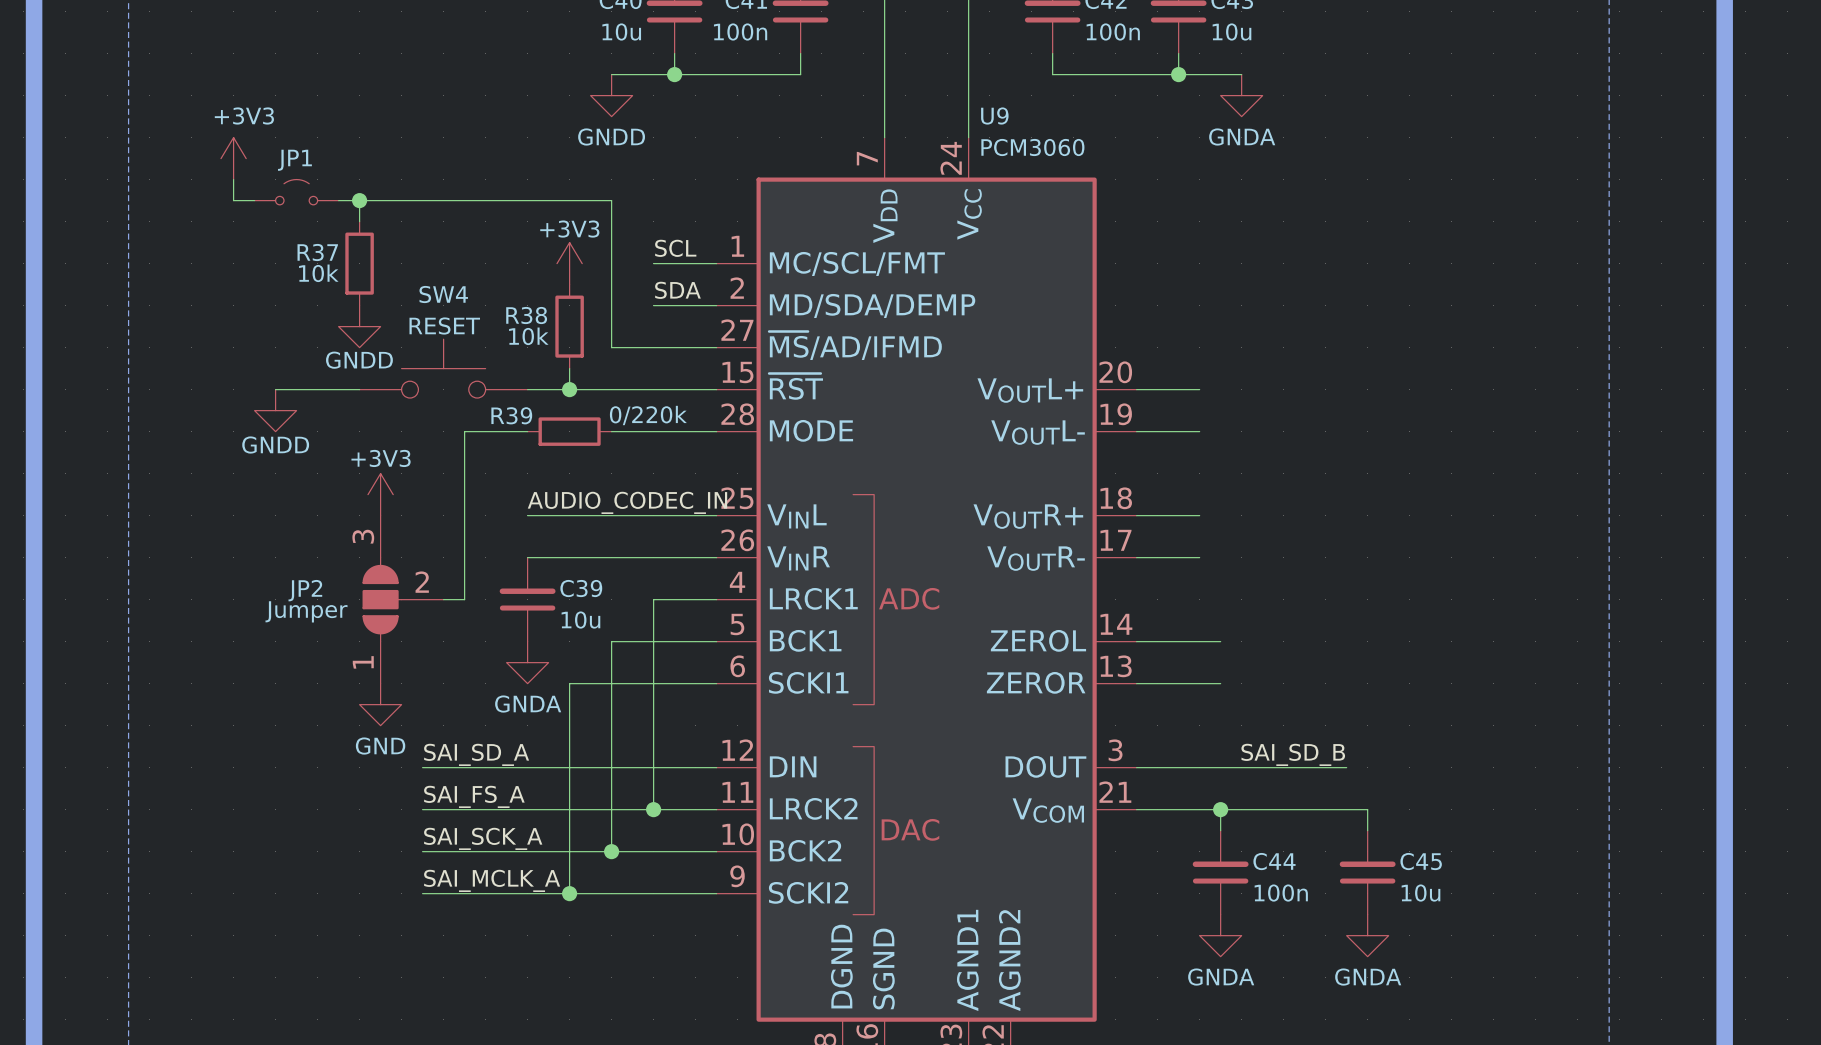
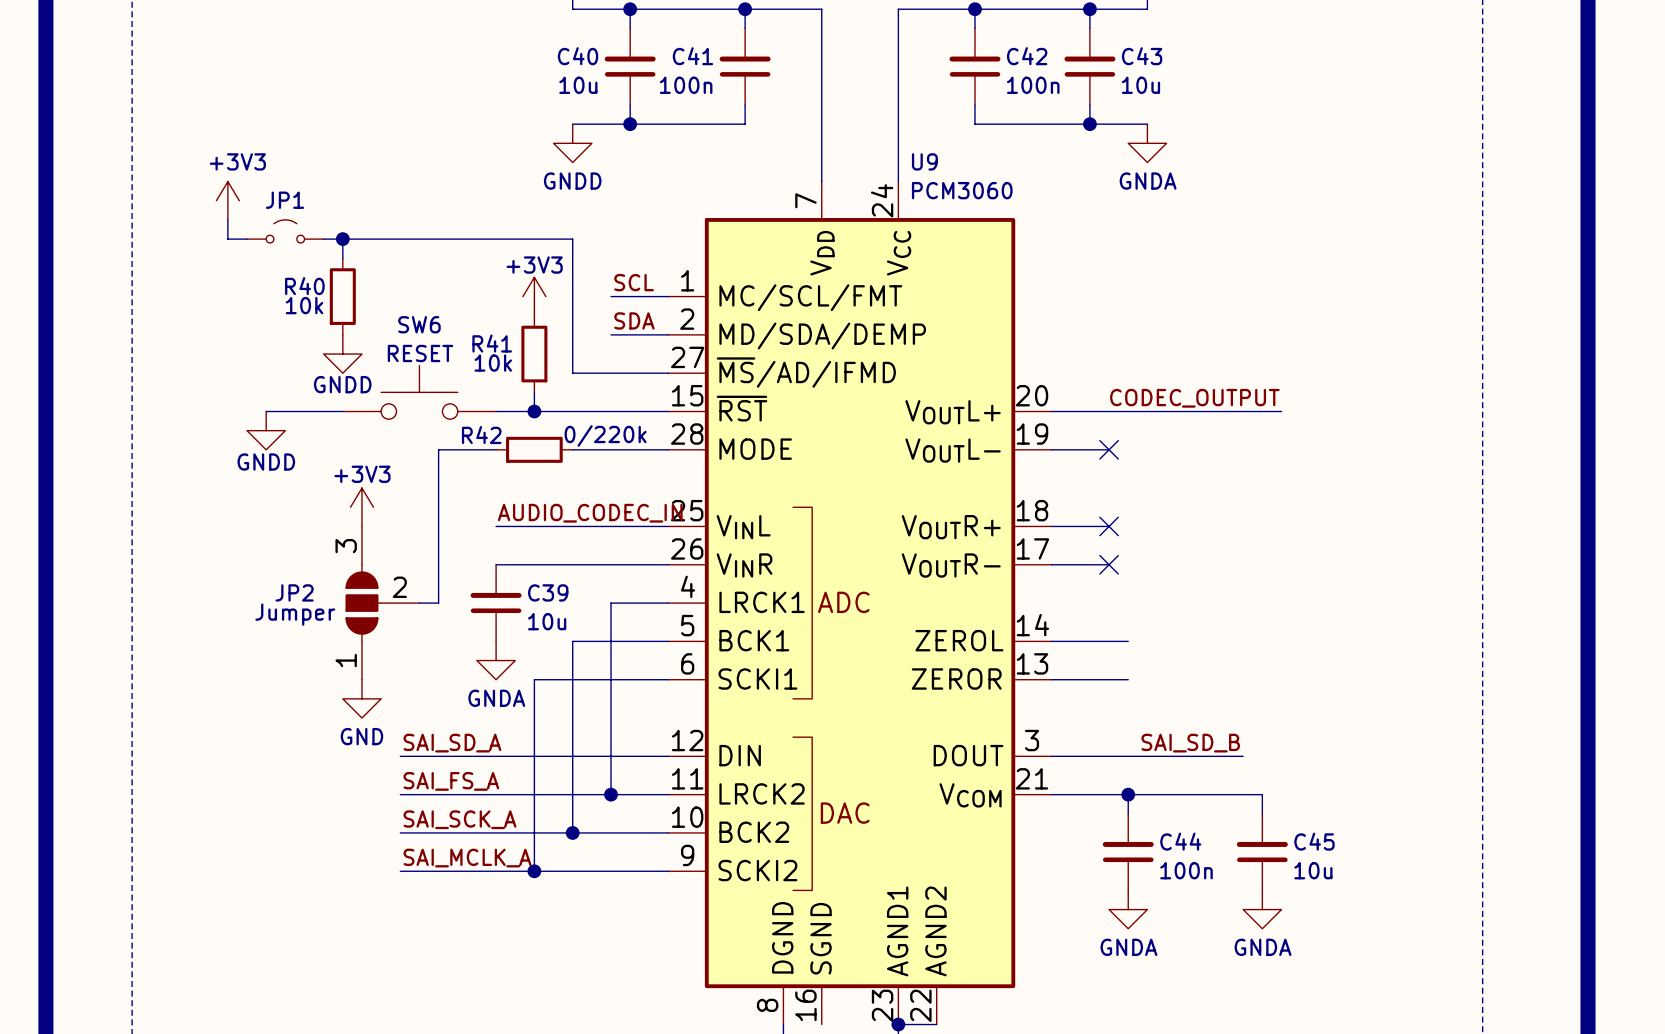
R37 name: R37 (317, 252) -> R40 (304, 286)
SW4 name: SW4 (443, 294) -> SW6 (419, 324)
R38 name: R38 (526, 315) -> R41 (492, 343)
label: none -> CODEC_OUTPUT (1194, 398)
wire: none -> (1109, 411) (1281, 411)
R39 name: R39 (511, 415) -> R42 (481, 435)
no-connect mark: none -> (1109, 449)
no-connect mark: none -> (1109, 526)
no-connect mark: none -> (1109, 564)

